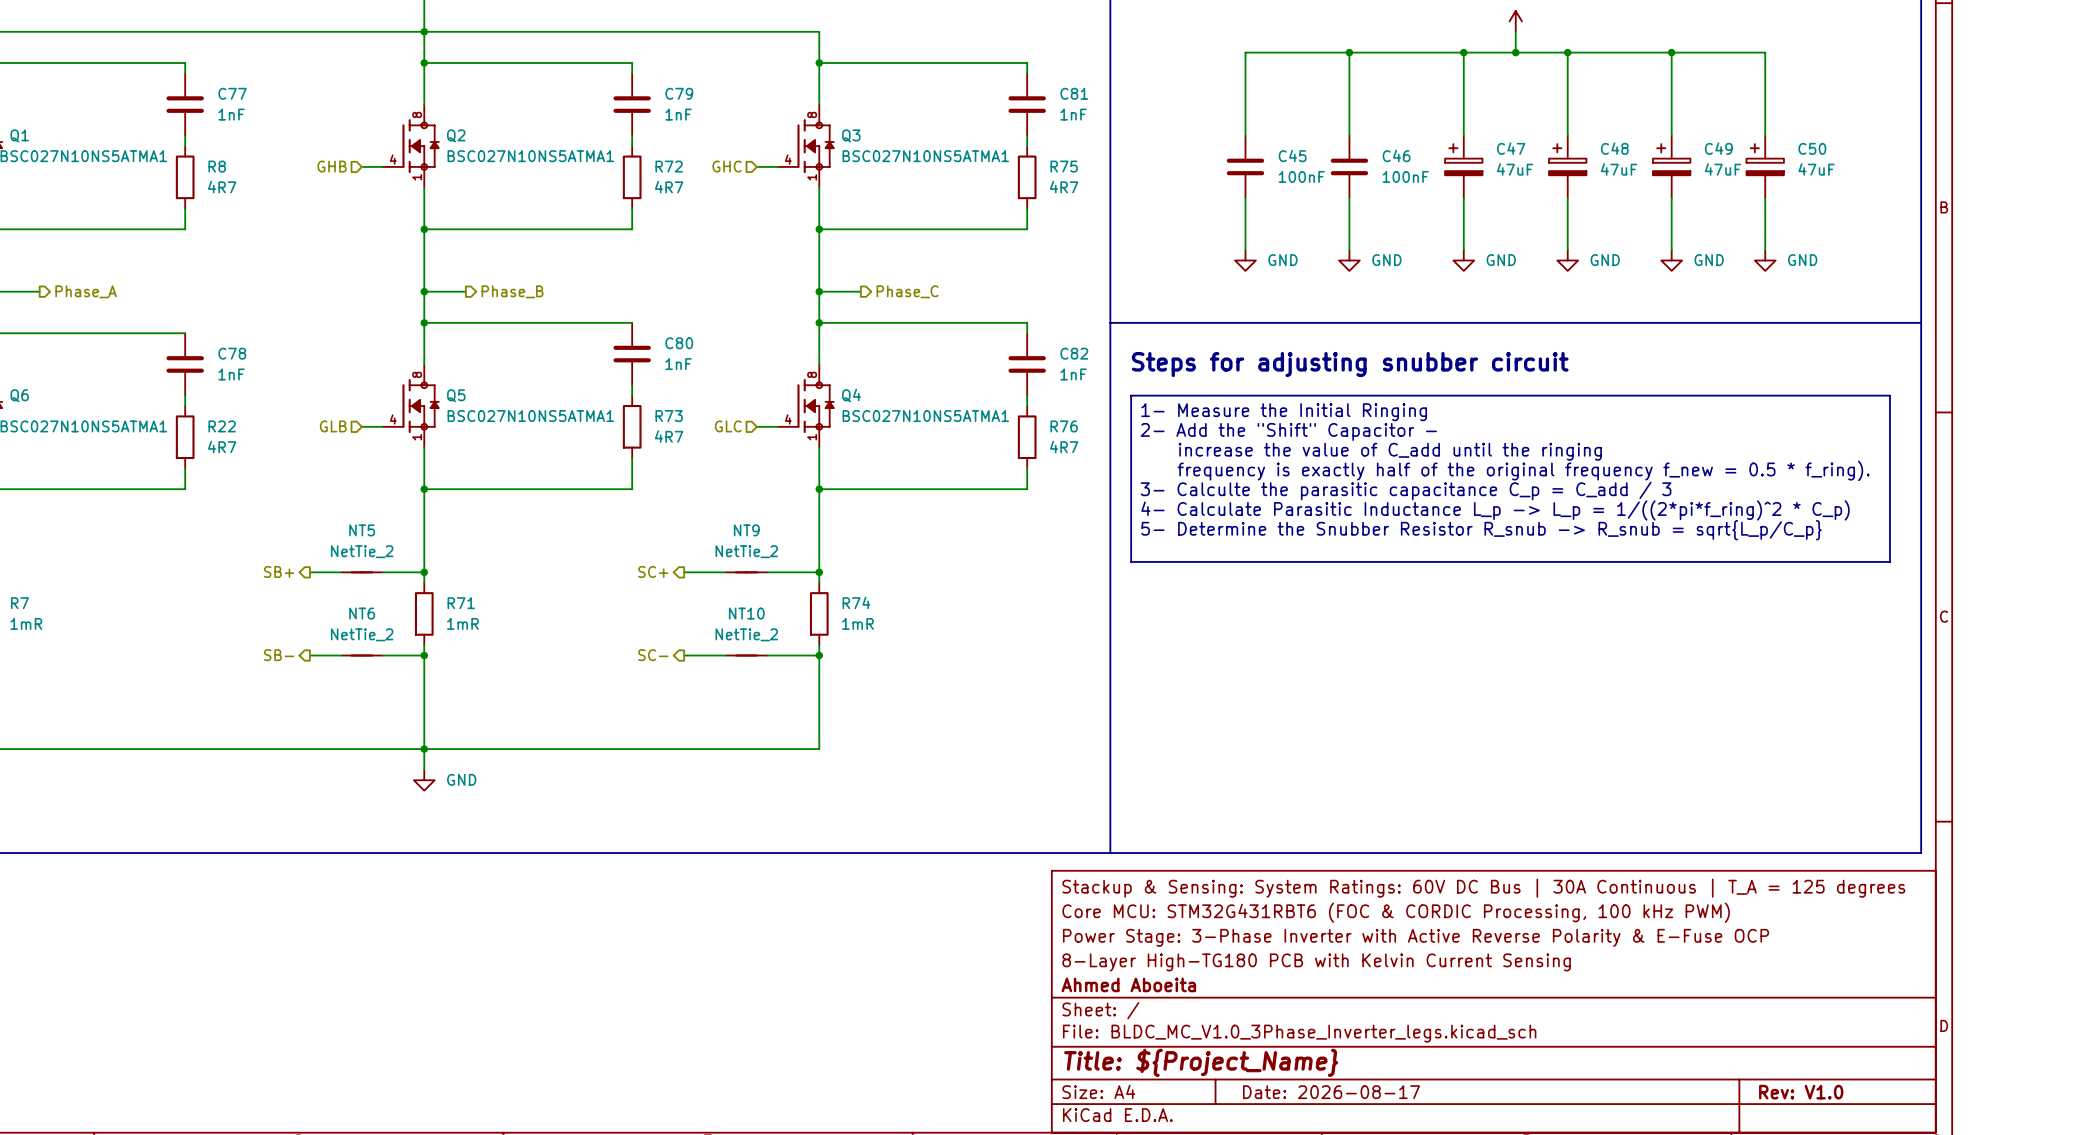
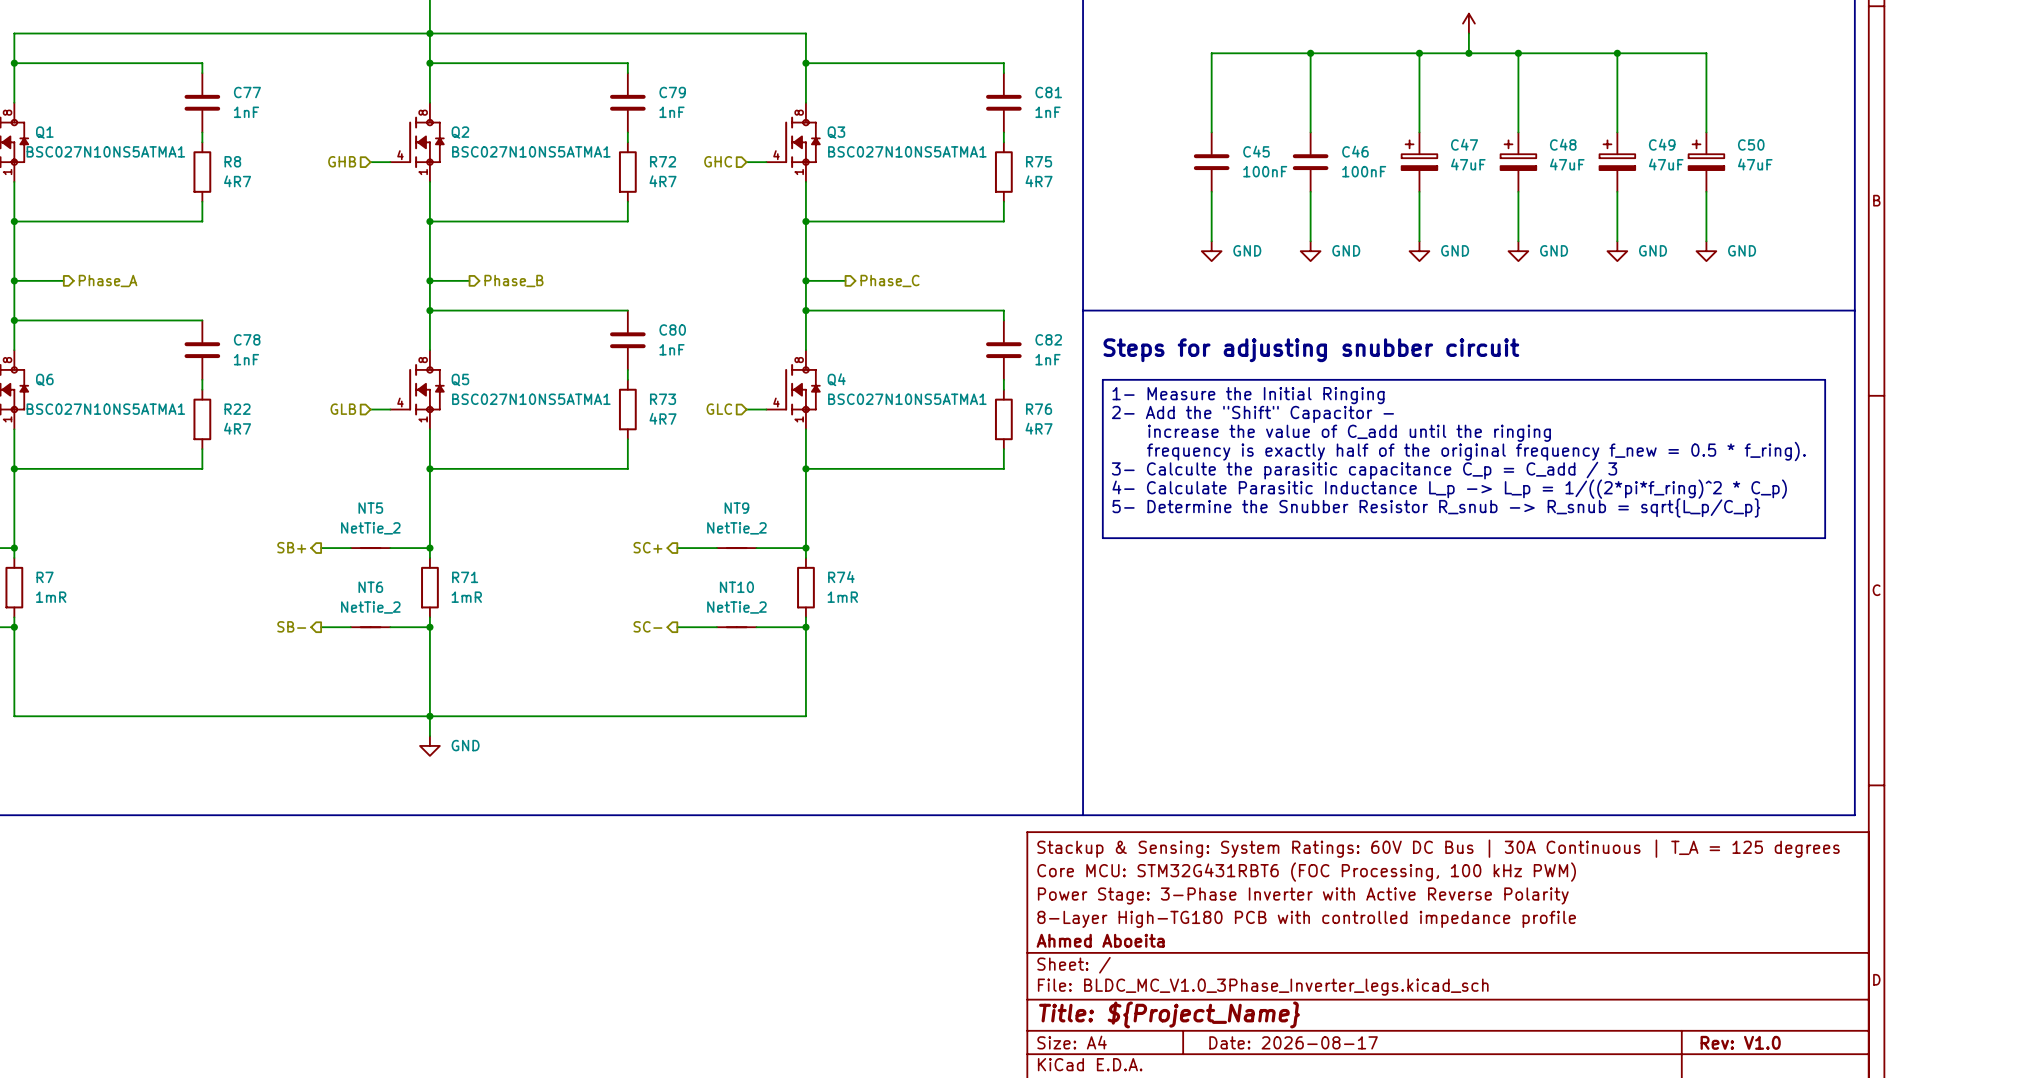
title block: Core MCU: STM32G431RBT6 (FOC & CORDIC Processing, 100 kHz PWM) (1396, 912) -> Core MCU: STM32G431RBT6 (FOC Processing, 100 kHz PWM) (1306, 872)
title block: Power Stage: 3-Phase Inverter with Active Reverse Polarity & E-Fuse OCP (1416, 937) -> Power Stage: 3-Phase Inverter with Active Reverse Polarity (1303, 895)
title block: 8-Layer High-TG180 PCB with Kelvin Current Sensing (1316, 962) -> 8-Layer High-TG180 PCB with controlled impedance profile (1306, 919)

